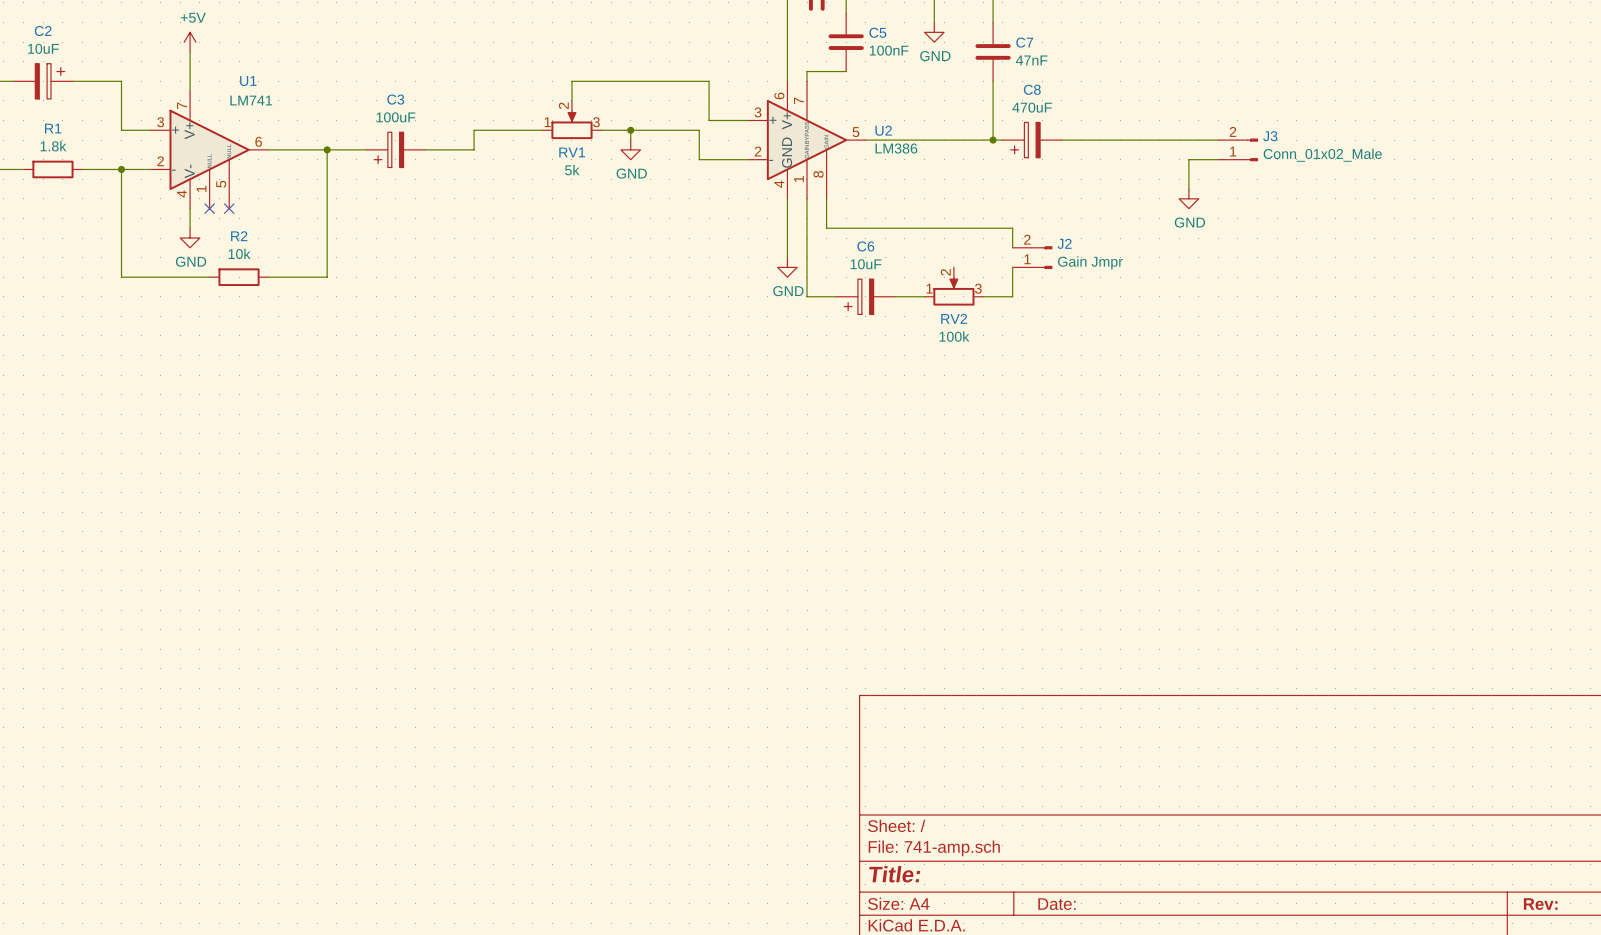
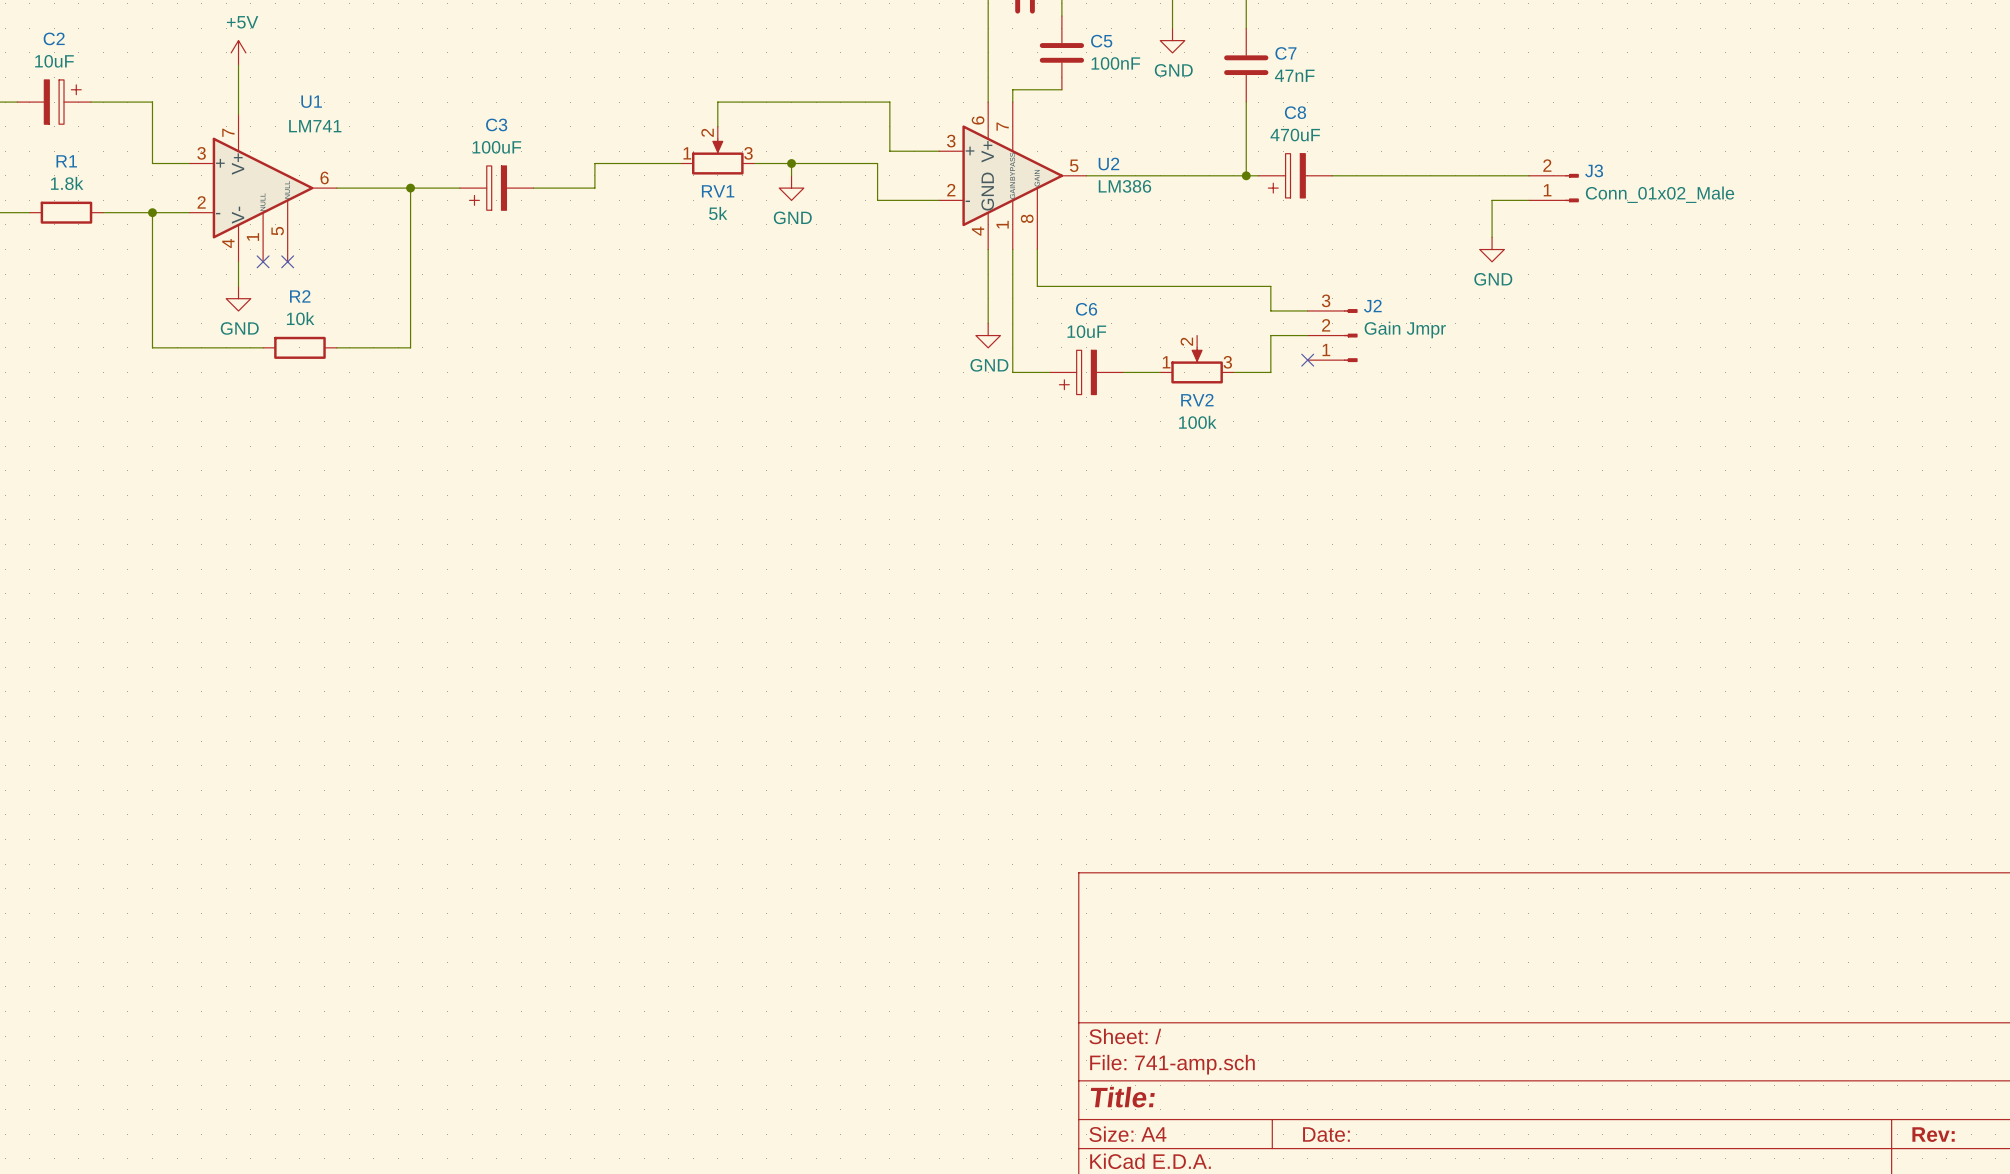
J2 symbol: [1012, 246, 1053, 269] -> [1307, 309, 1358, 363]
no-connect mark: none -> (1307, 360)

